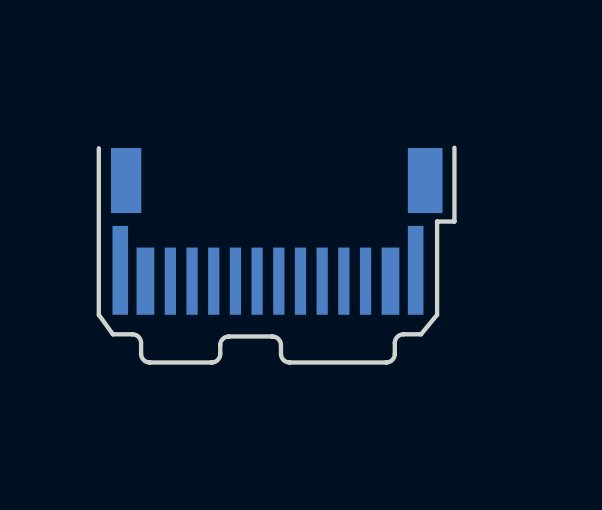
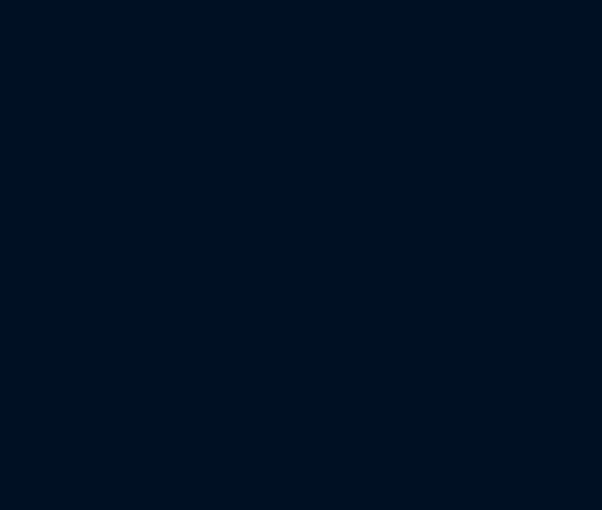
part: (276, 255) -> none

